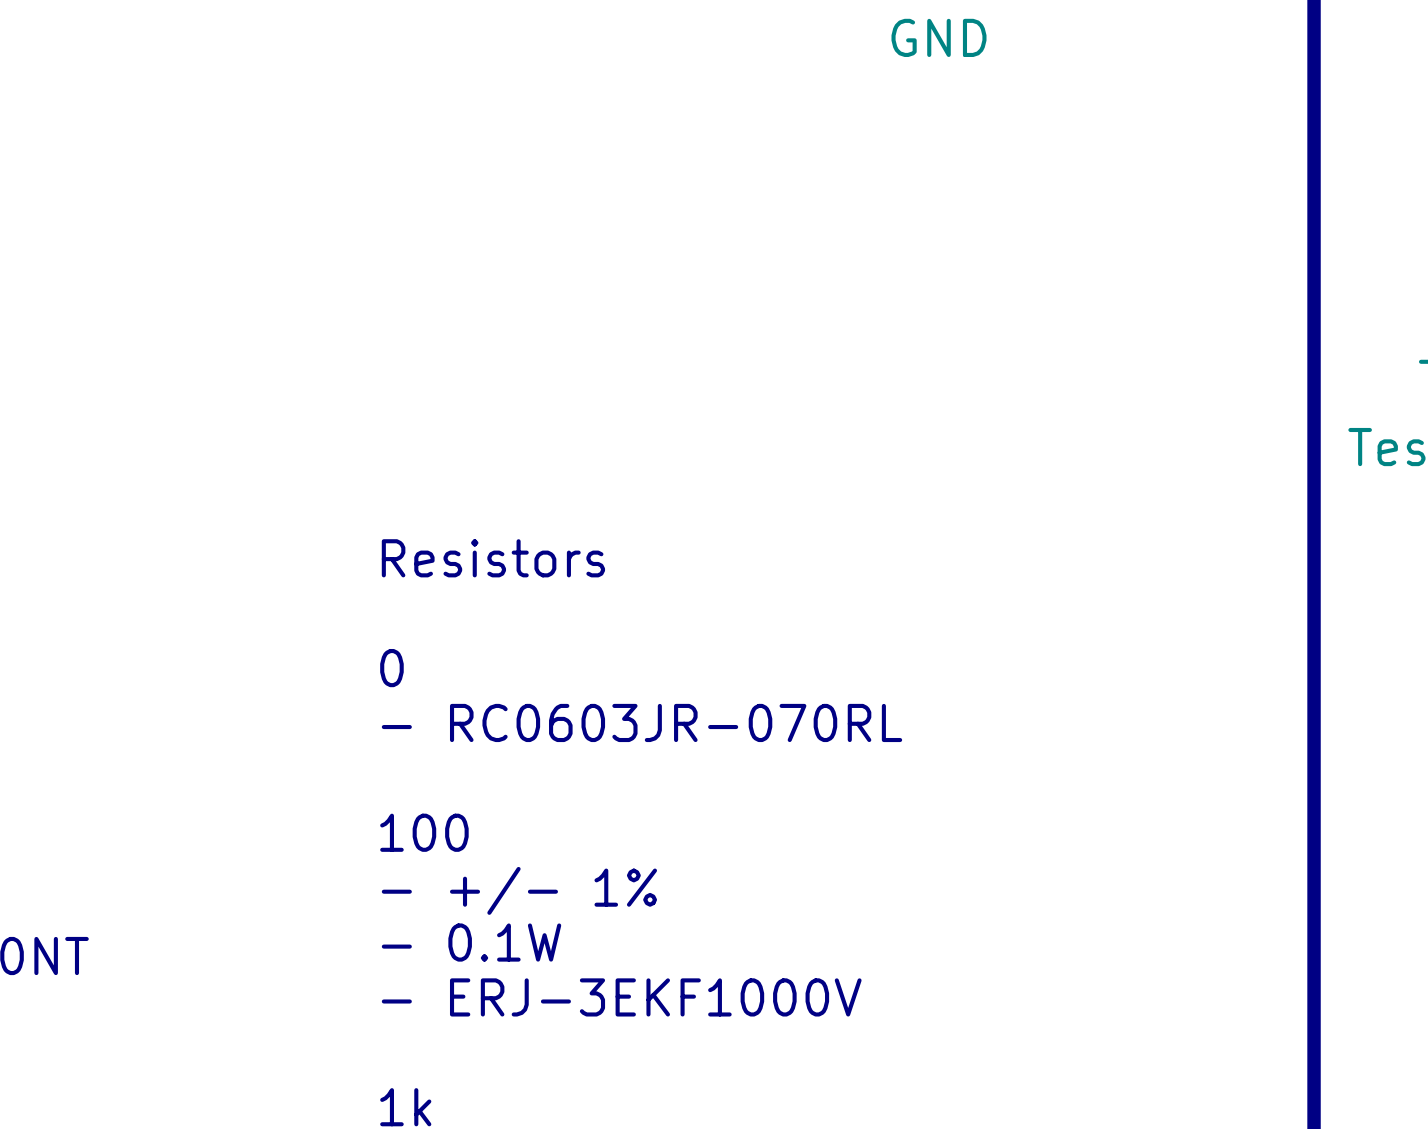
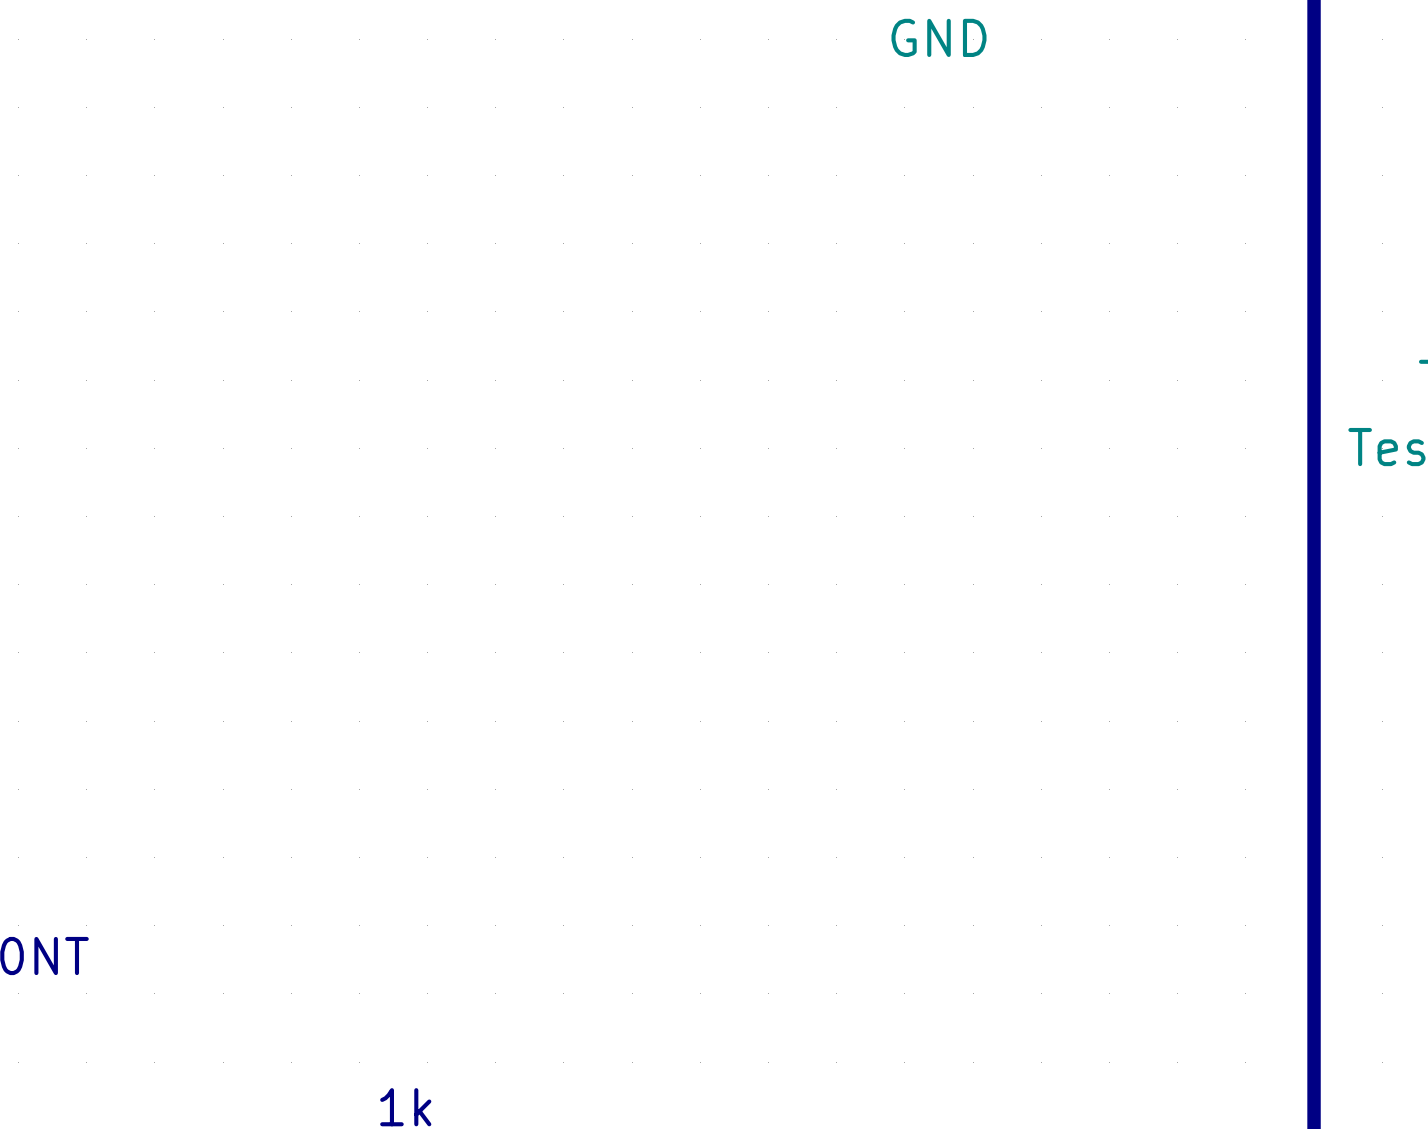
text: Resistors (493, 558) -> none
text: 0 (391, 668) -> none
text: - RC0603JR-070RL (641, 722) -> none
text: 100 (424, 832) -> none
text: - +/- 1% (519, 890) -> none
text: - 0.1W (471, 942) -> none
text: - ERJ-3EKF1000V (621, 997) -> none

